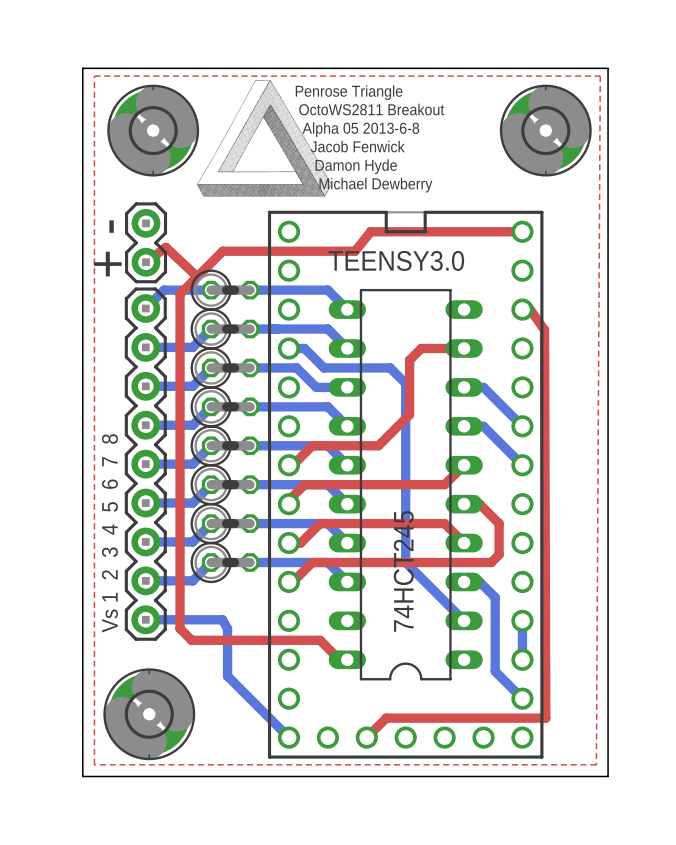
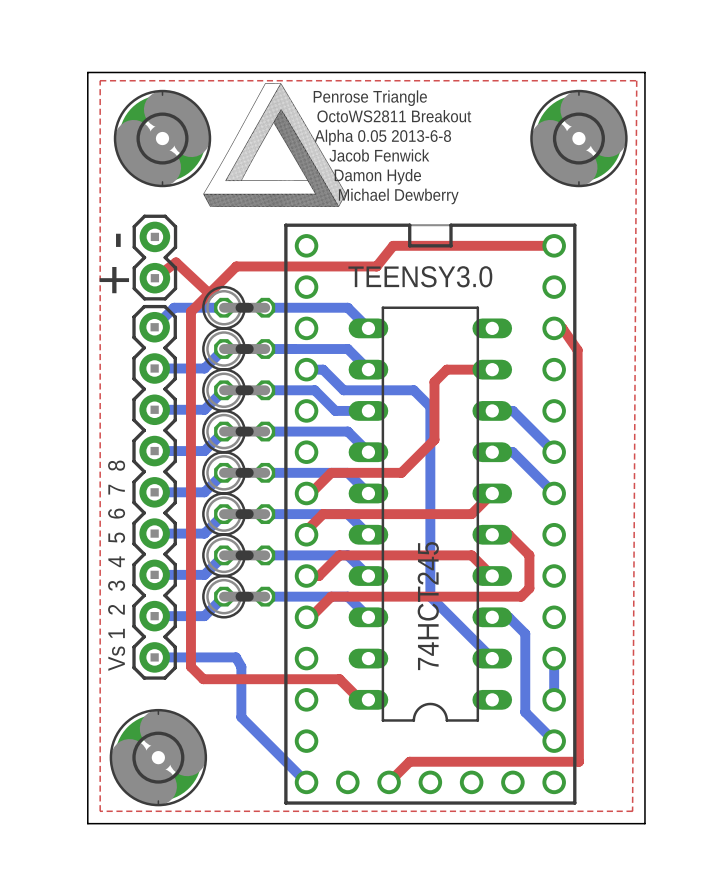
drawing shape: [197, 80, 332, 197] -> [203, 83, 346, 207]
text: Alpha 05 2013-6-8 (360, 129) -> Alpha 0.05 2013-6-8 (382, 137)

